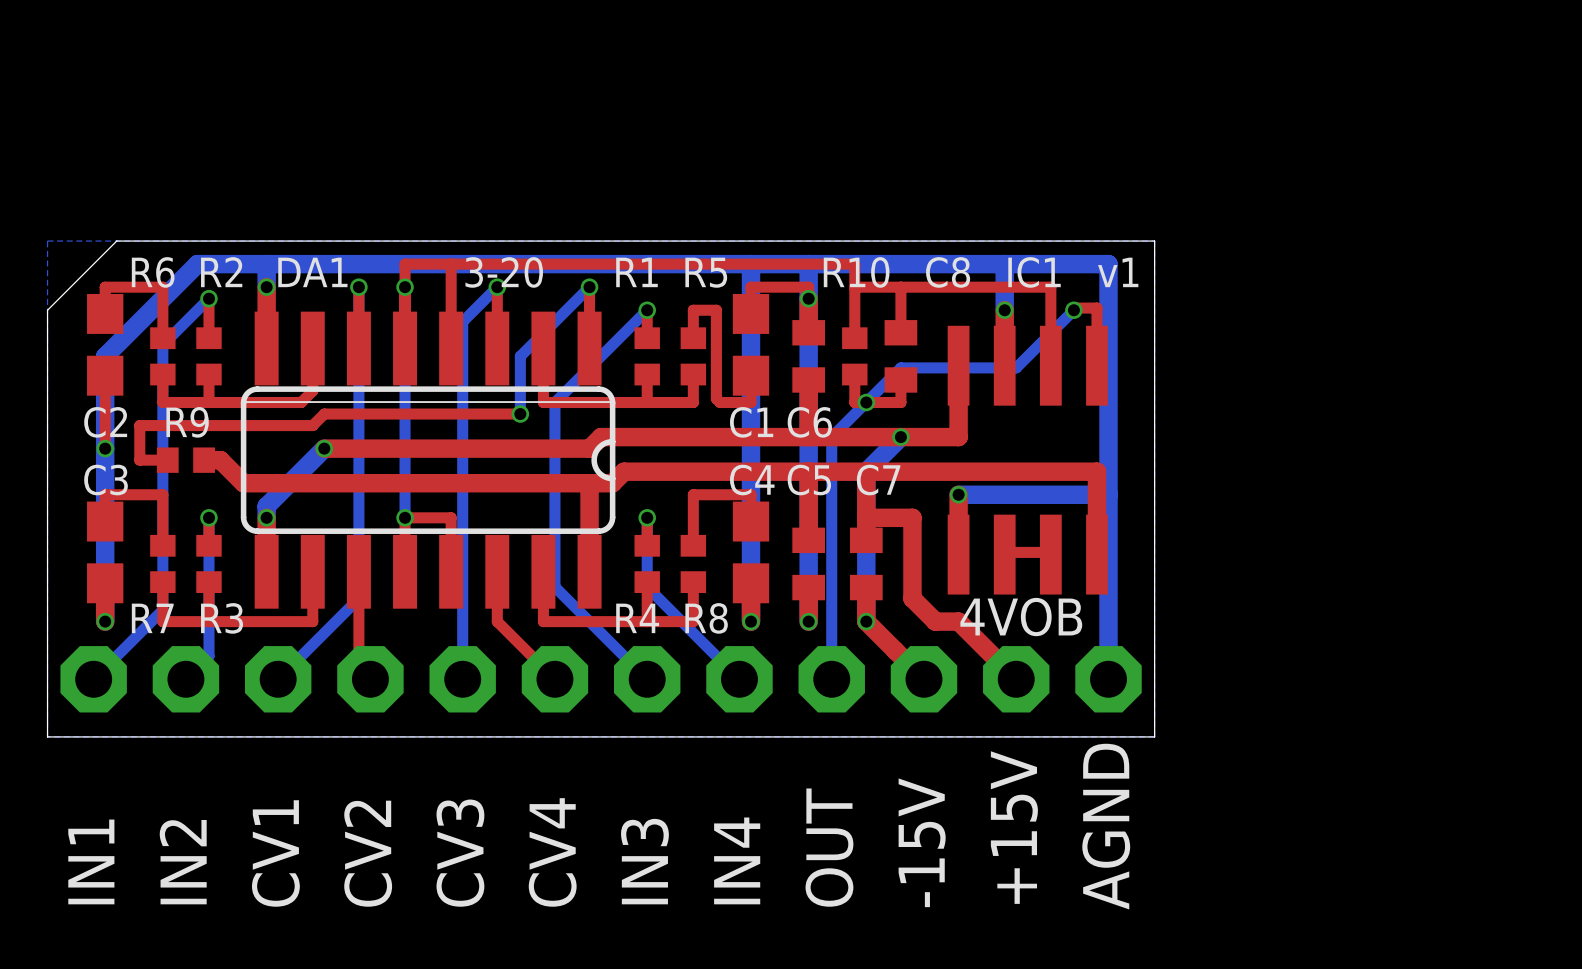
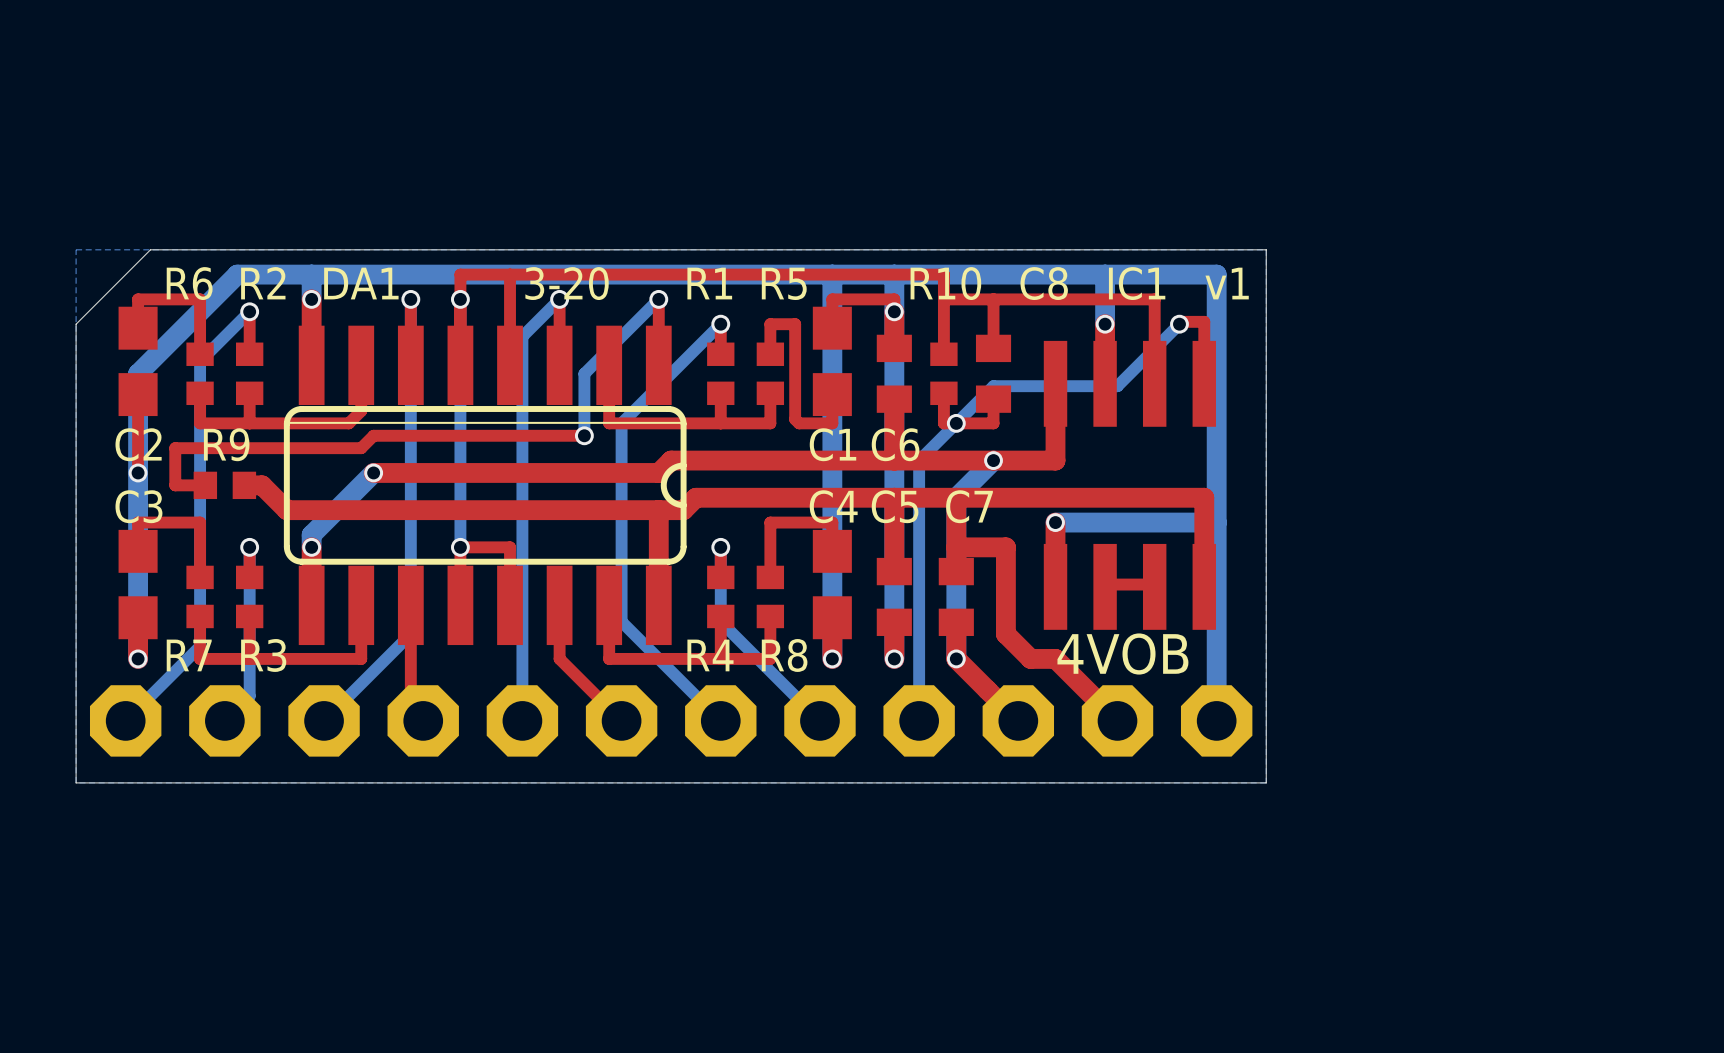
AGND name: AGND (1106, 826) -> none
+15V name: +15V (1014, 827) -> none
-15V name: -15V (922, 842) -> none
OUT name: OUT (829, 847) -> none
CV4 name: CV4 (552, 852) -> none
CV1 name: CV1 (275, 853) -> none
CV2 name: CV2 (368, 853) -> none
CV3 name: CV3 (460, 853) -> none
IN4 name: IN4 (737, 860) -> none
IN1 name: IN1 (91, 861) -> none
IN3 name: IN3 (644, 861) -> none
IN2 name: IN2 (183, 862) -> none

